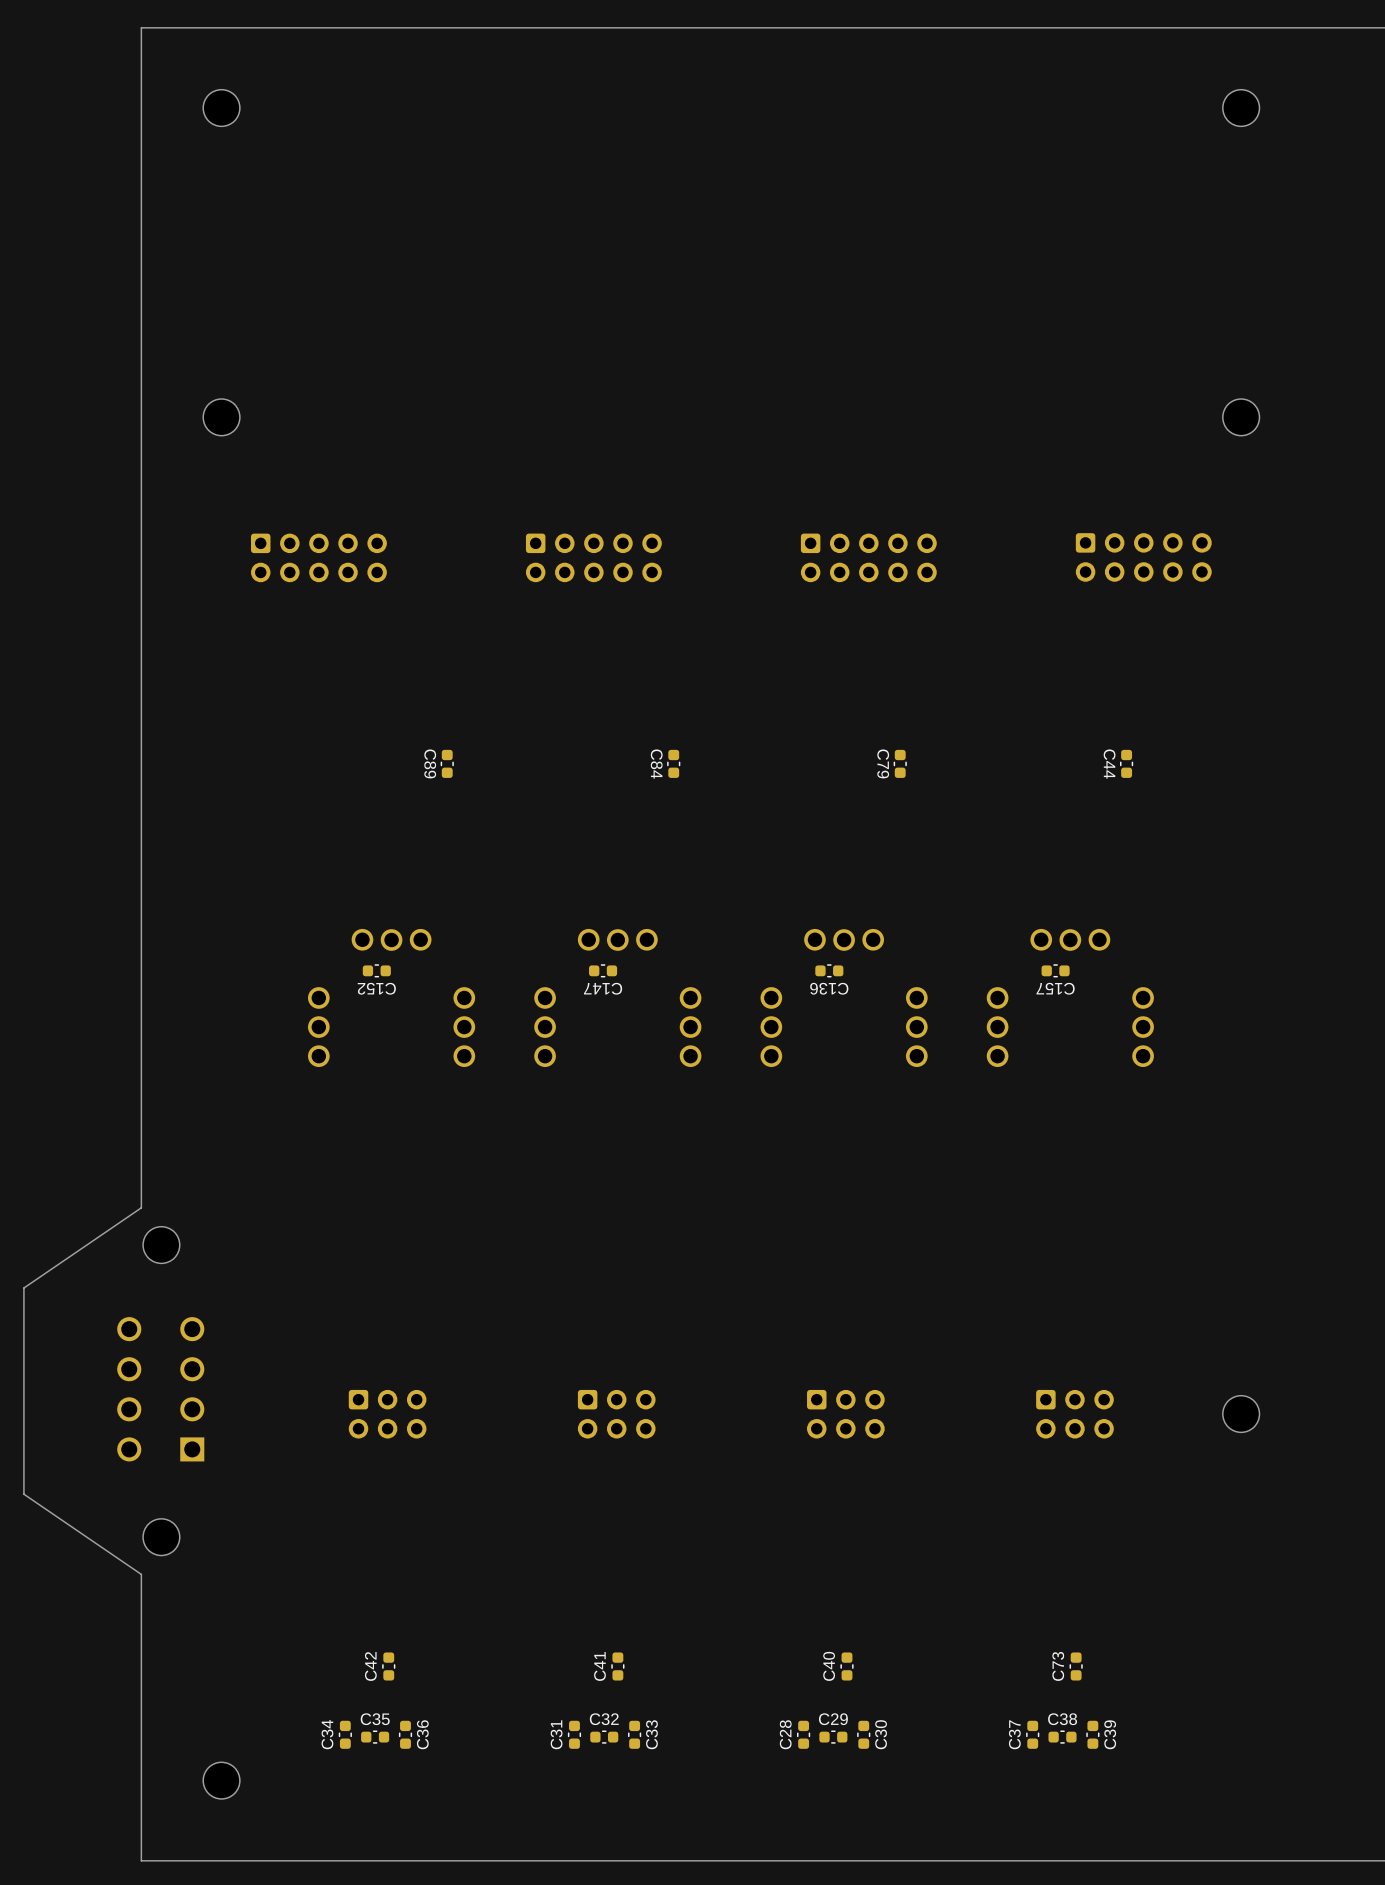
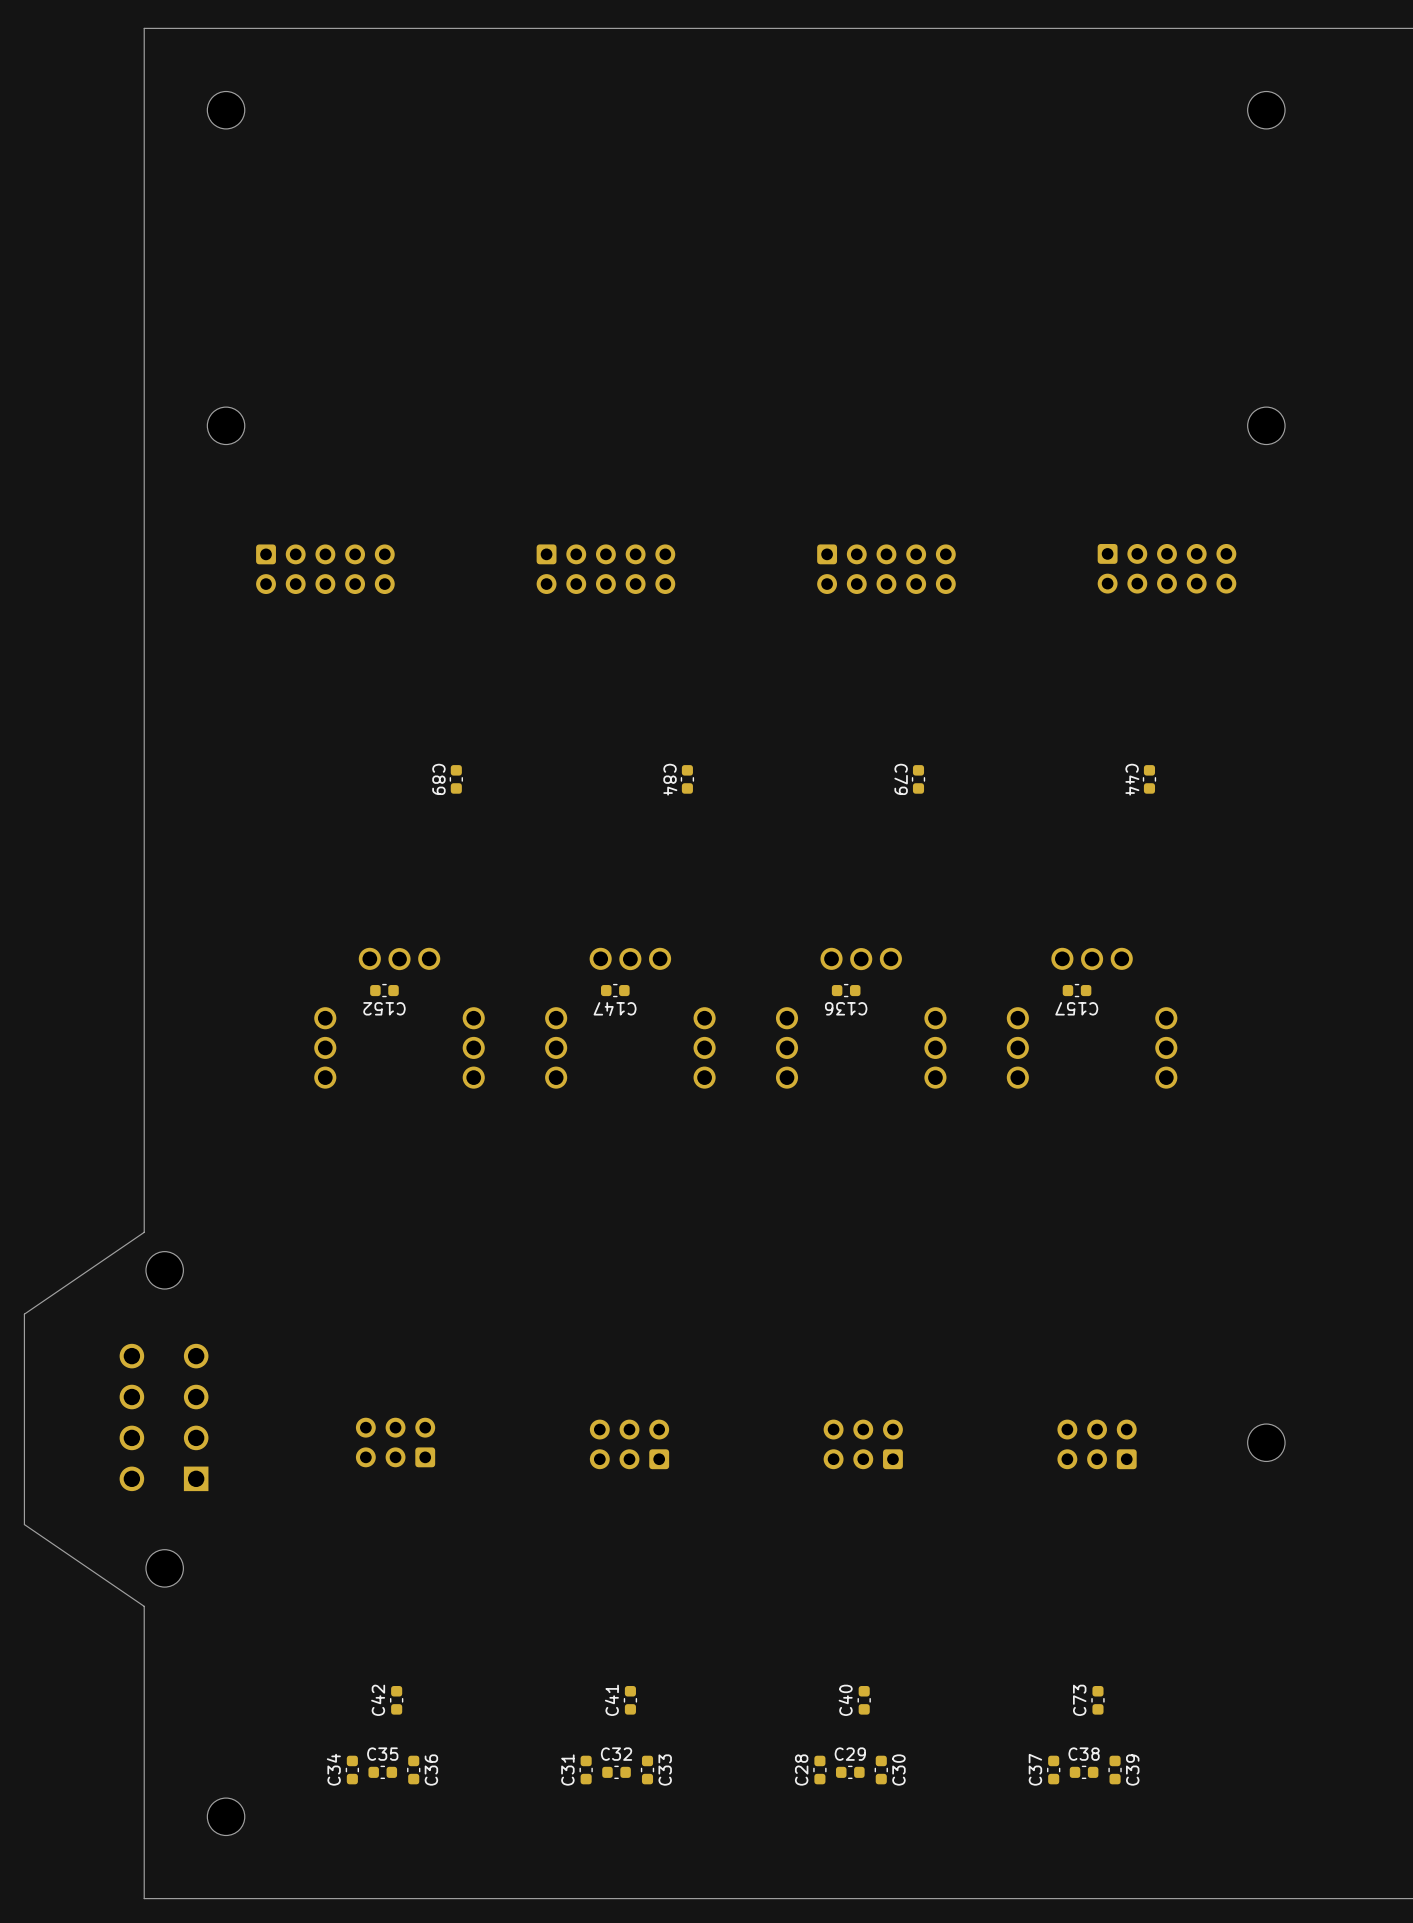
part rotation: 0° (387, 1414) -> 180° (395, 1442)
part rotation: 0° (616, 1414) -> 180° (629, 1444)
part rotation: 0° (845, 1414) -> 180° (863, 1444)
part rotation: 0° (1074, 1414) -> 180° (1097, 1444)

